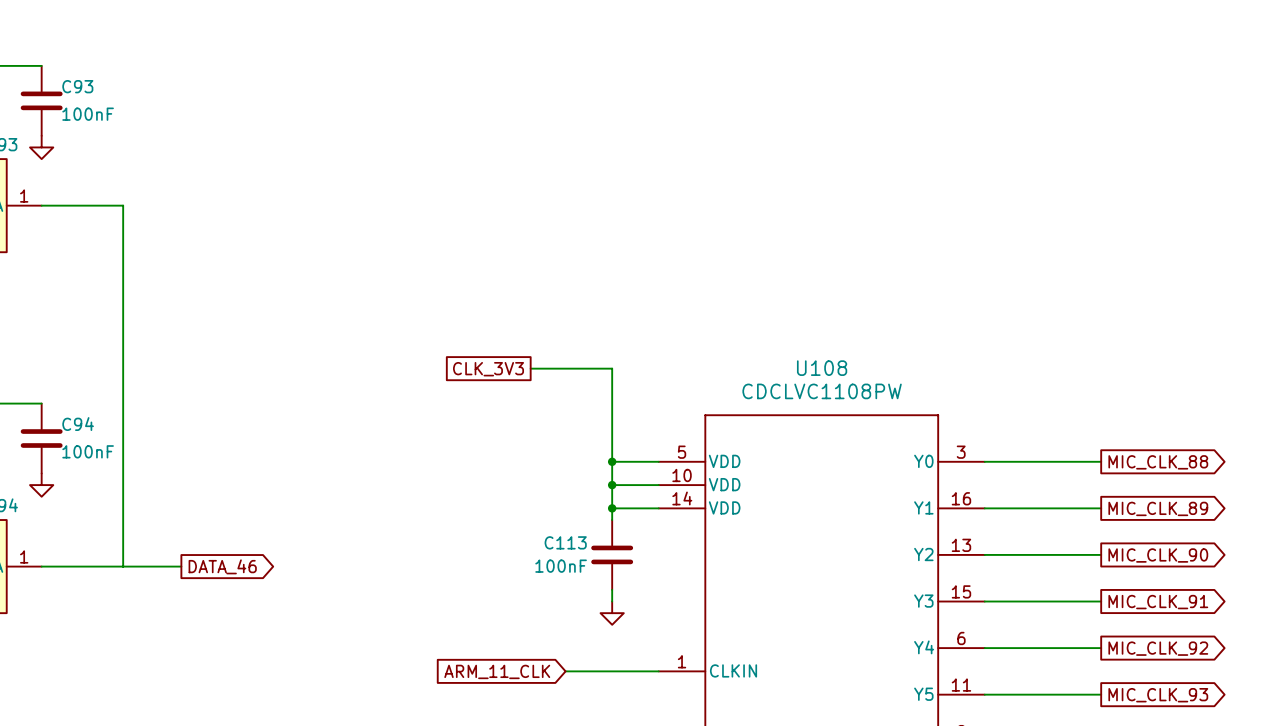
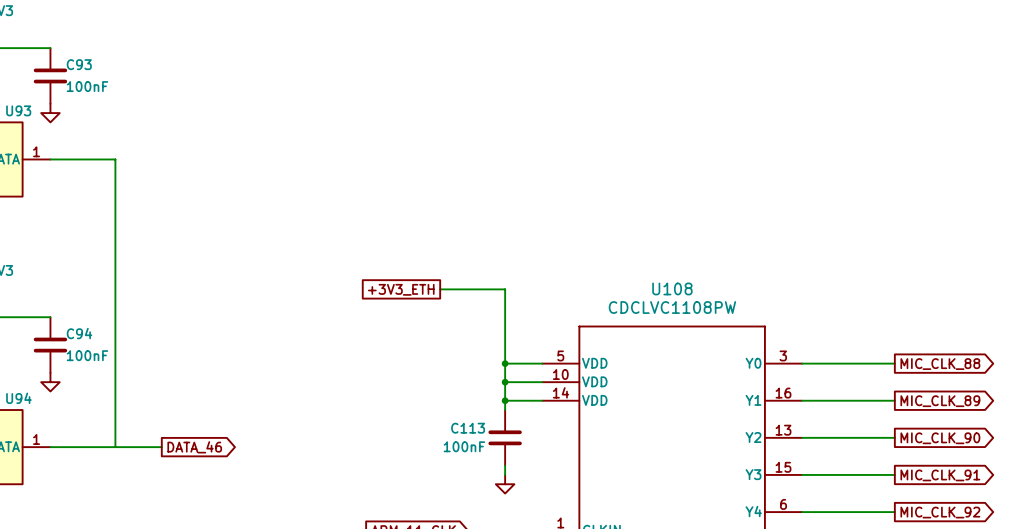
global label: CLK_3V3 (488, 369) -> +3V3_ETH (401, 289)

